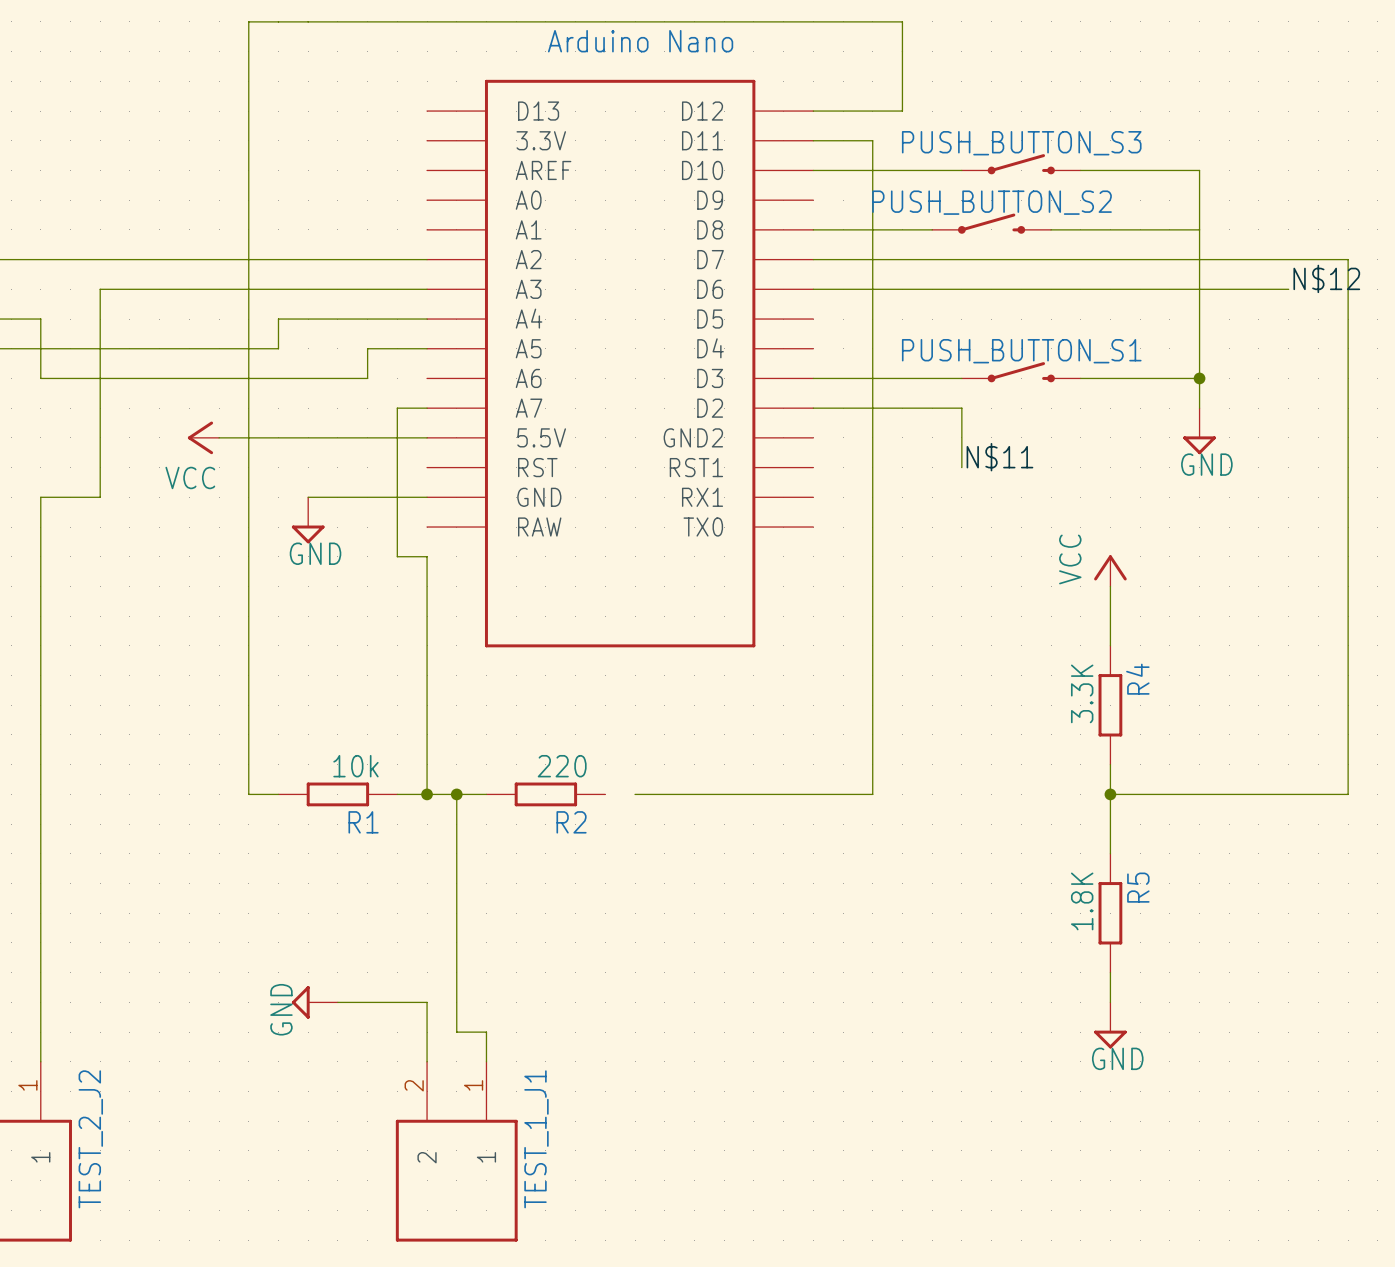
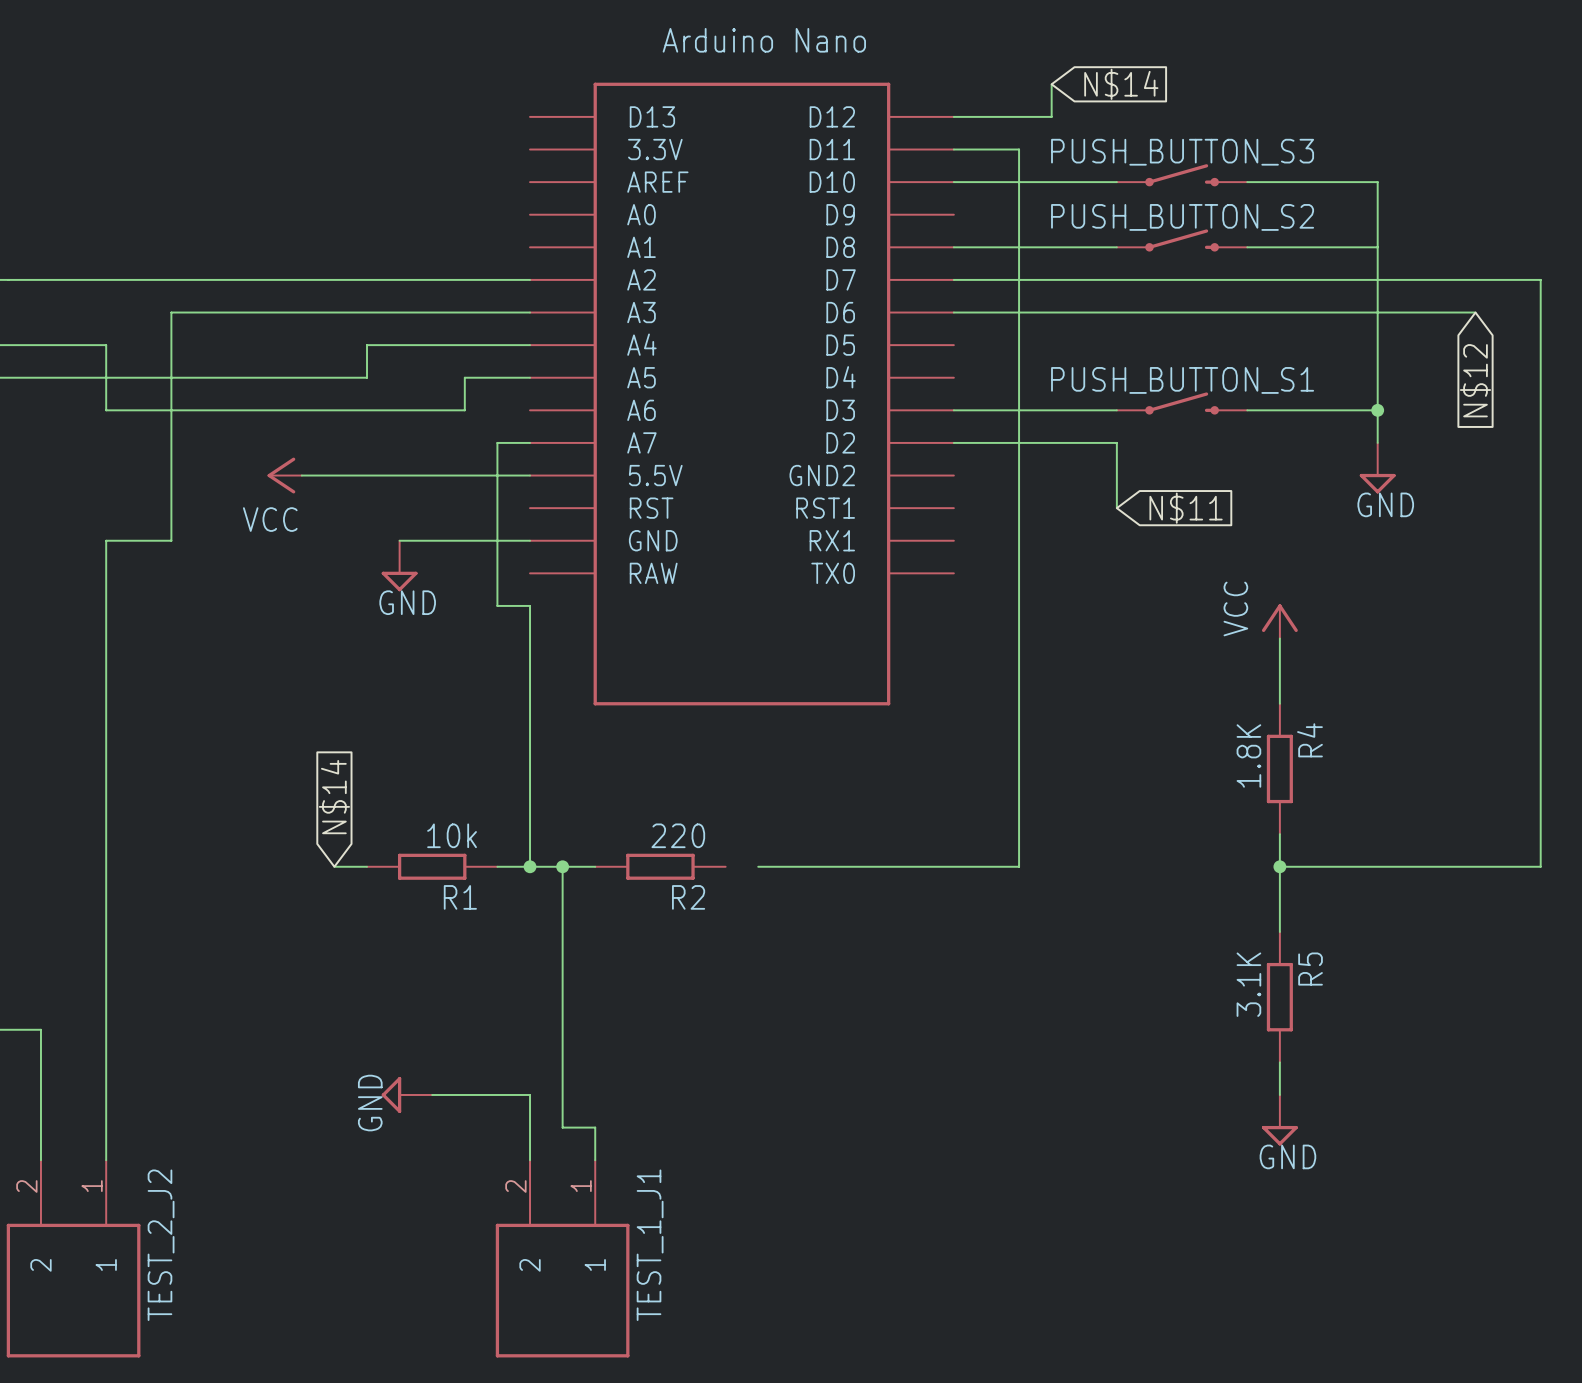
wire: (902, 81) (902, 21) (248, 21) (248, 794) -> none
global label: none -> N$14 (1121, 84)
PUSH_BUTTON_S2 position: (991, 223) -> (1182, 240)
label: N$12 (1326, 278) -> none
global label: none -> N$12 (1475, 380)
label: N$11 (999, 457) -> none
global label: none -> N$11 (1186, 508)
R4 value: 3.3K (1082, 693) -> 1.8K (1248, 755)
global label: none -> N$14 (334, 797)
R5 value: 1.8K (1082, 901) -> 3.1K (1248, 984)

